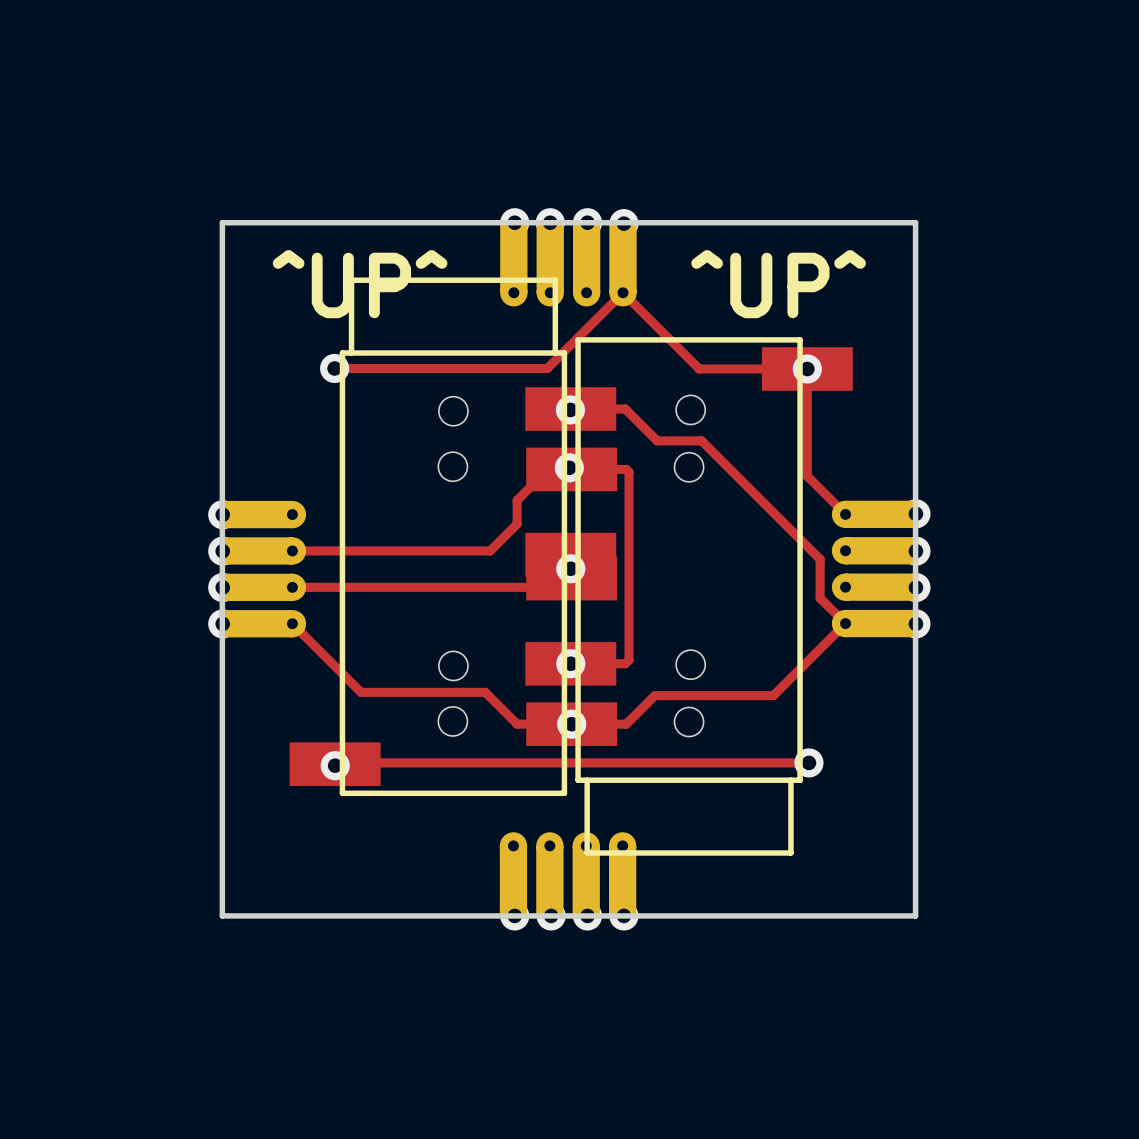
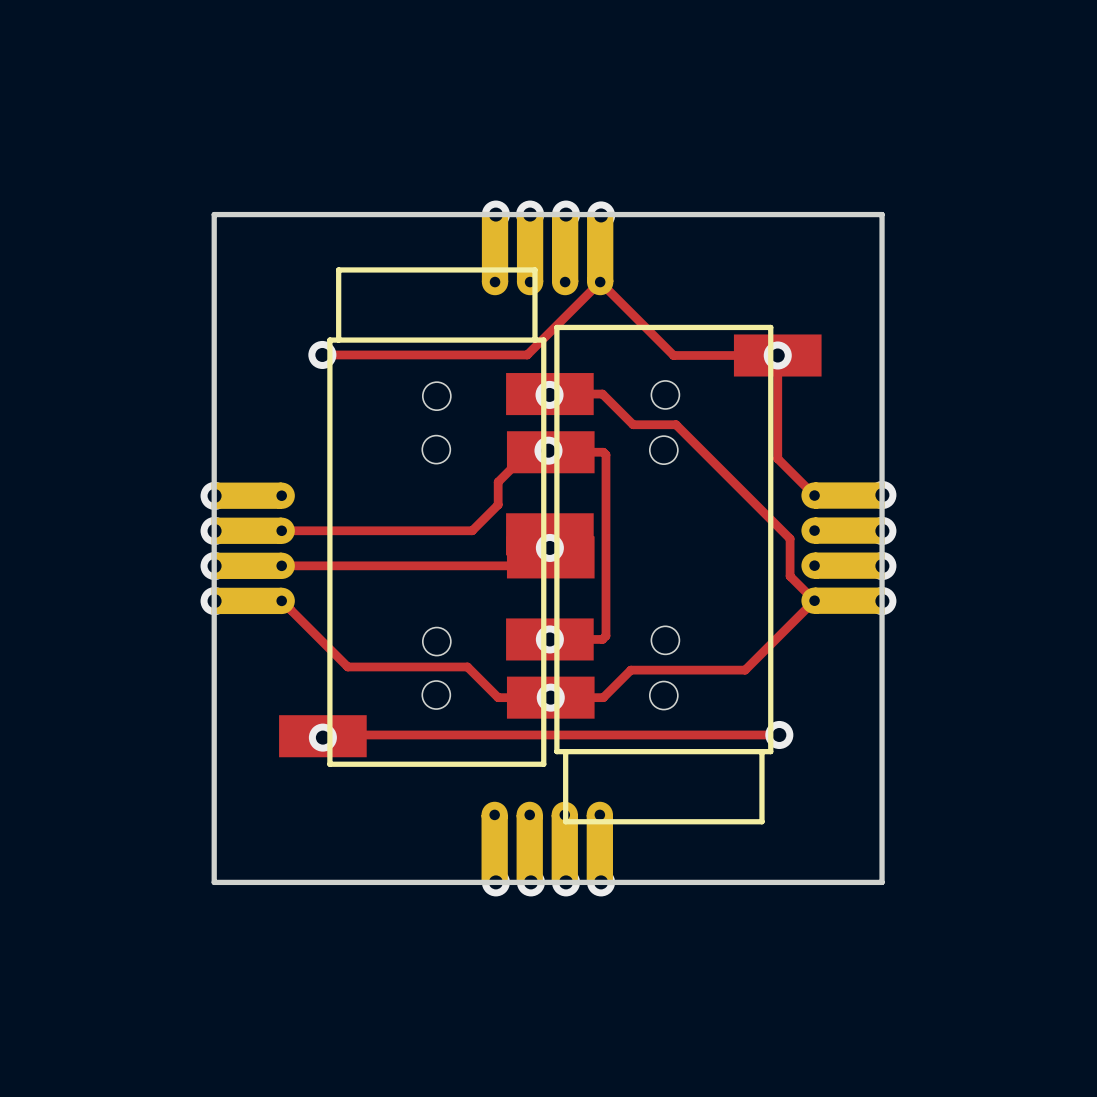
text: ^UP^ (360, 284) -> none
text: ^UP^ (778, 284) -> none

